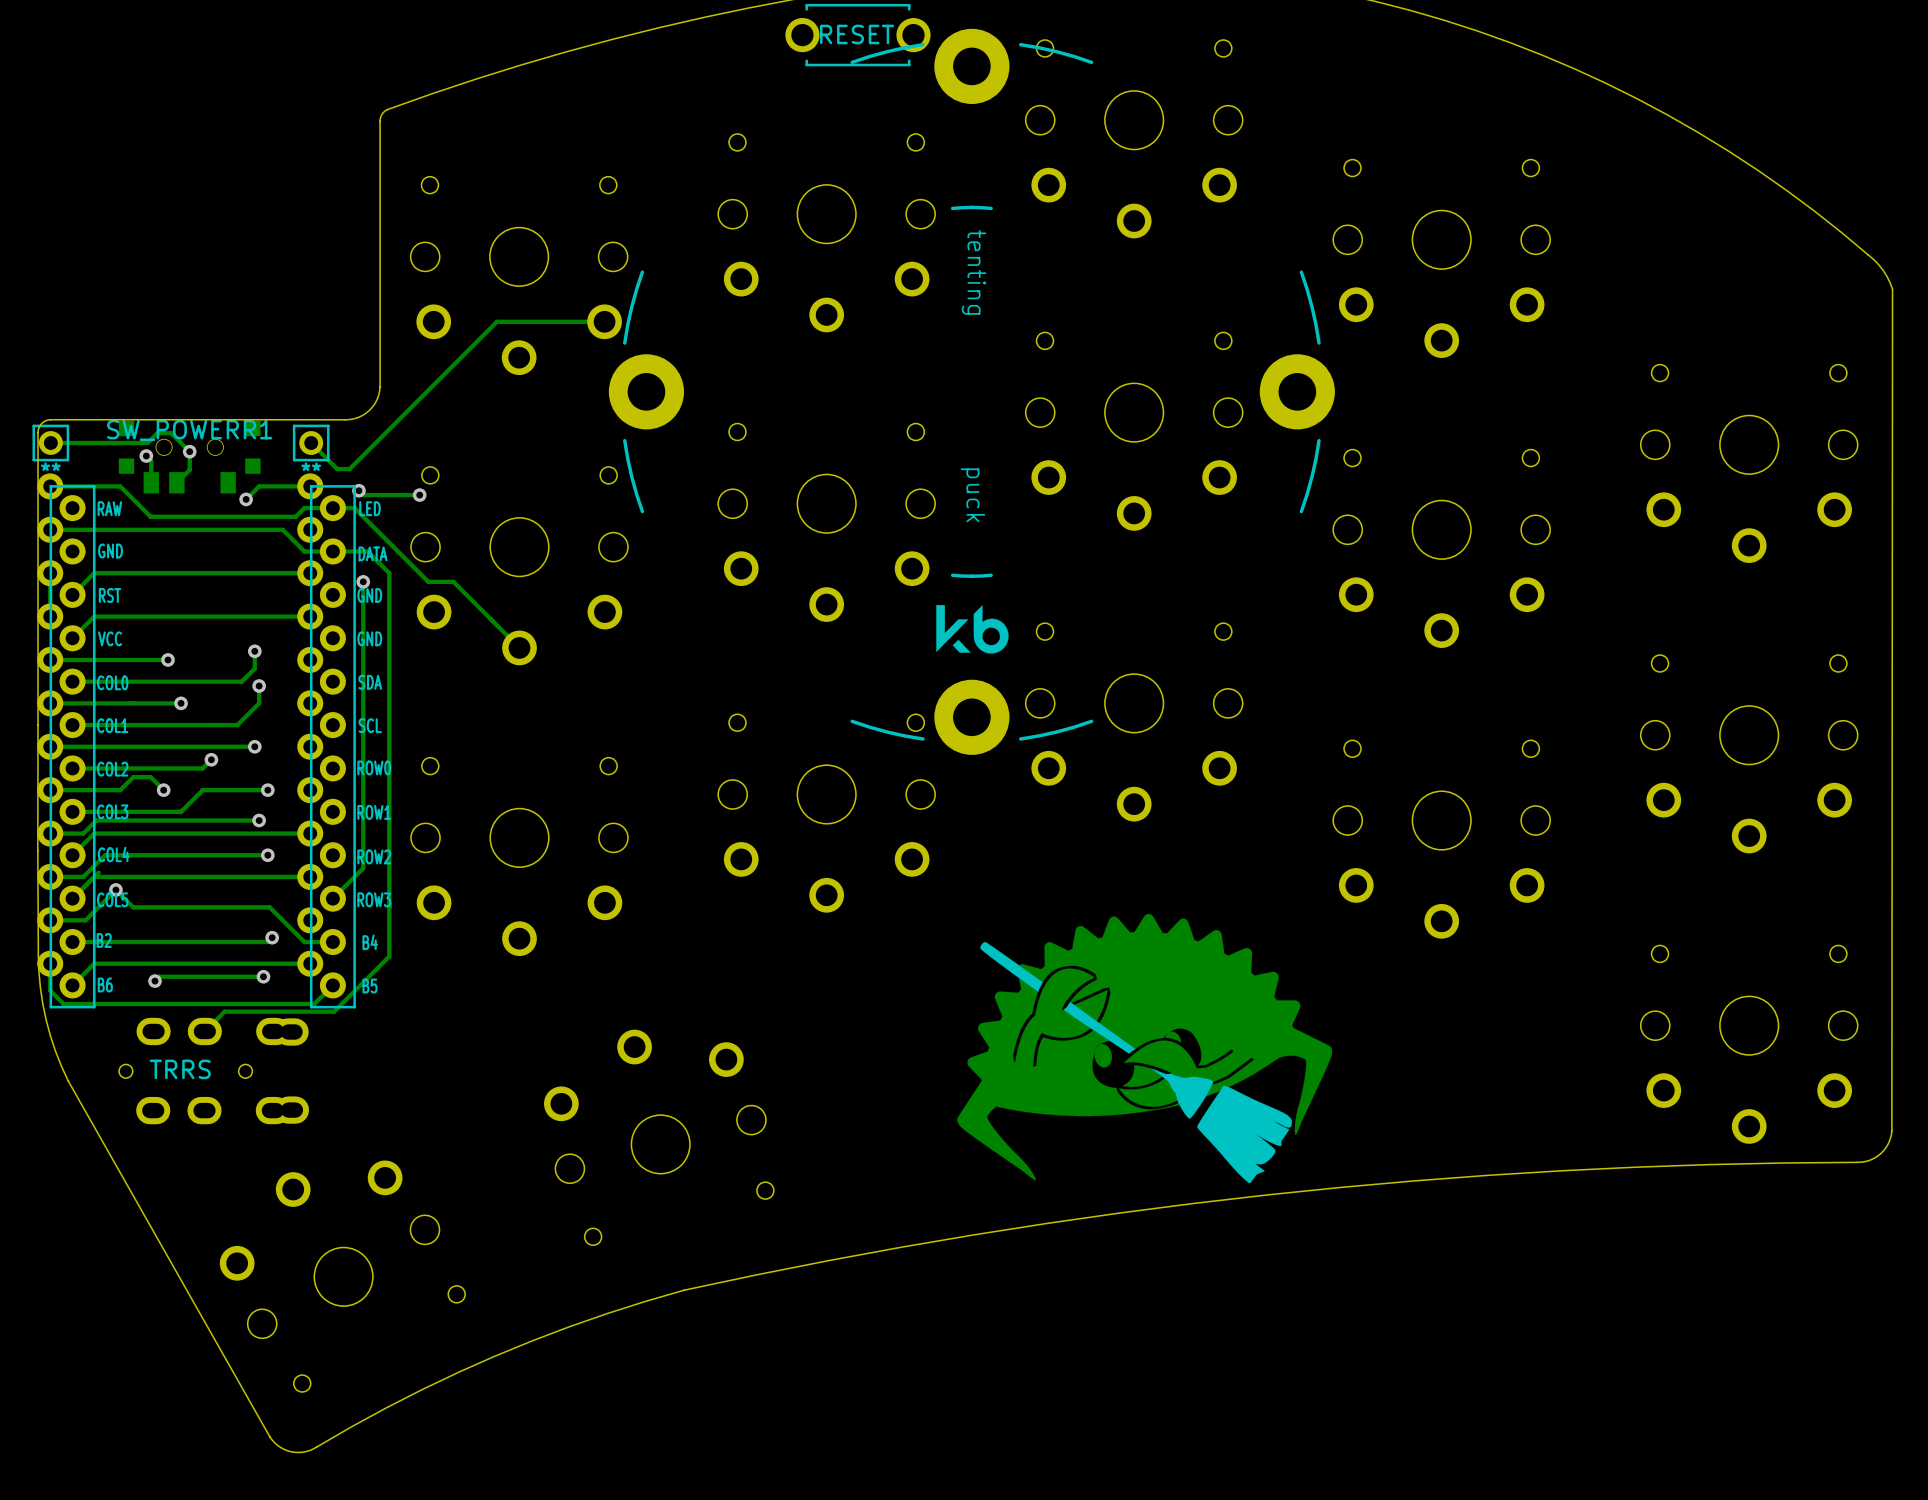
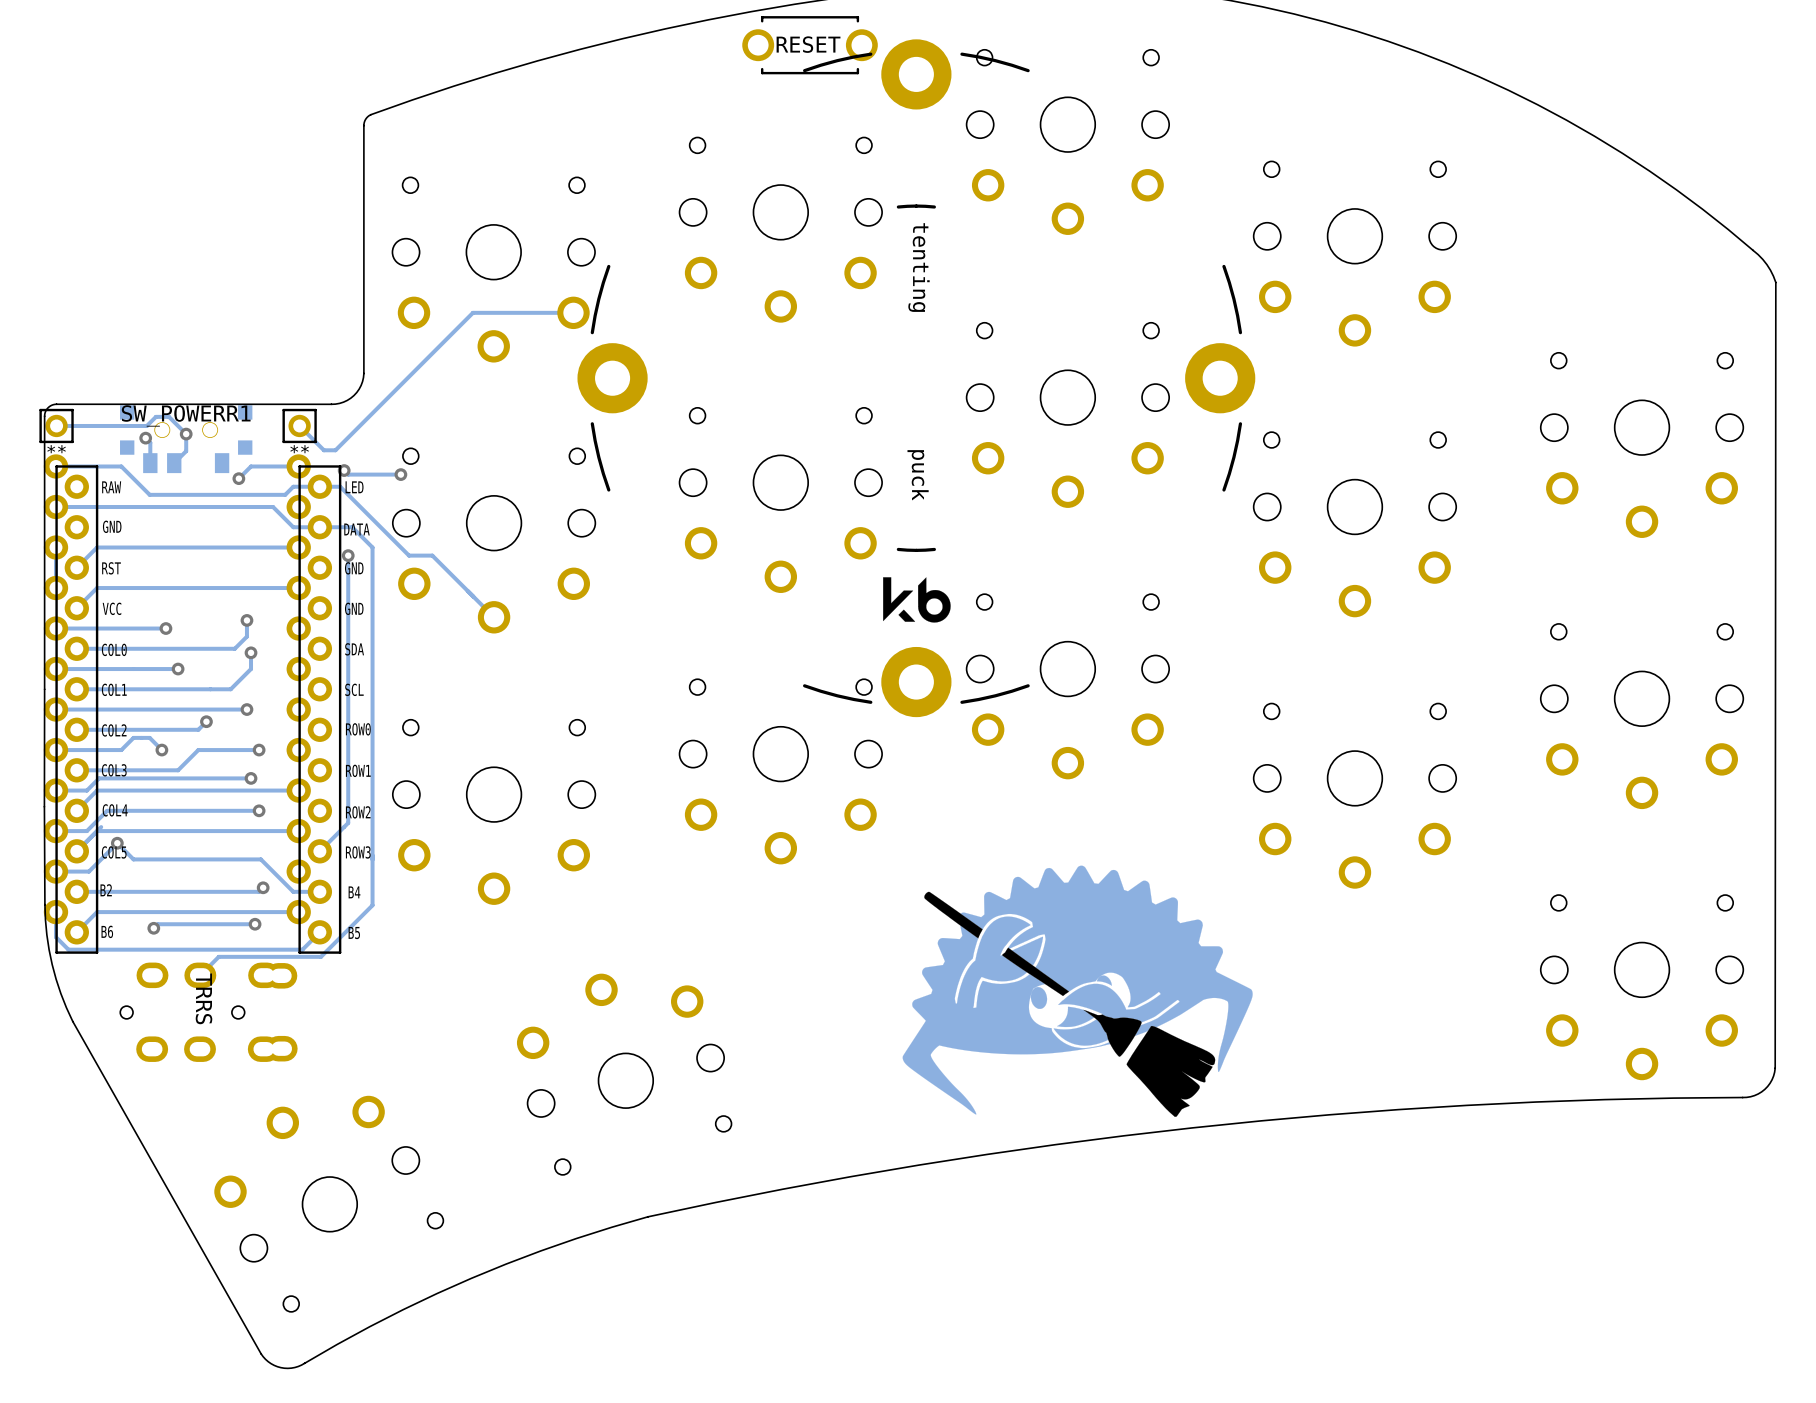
part text rotation: 0° (180, 1069) -> 90° clockwise (204, 998)

